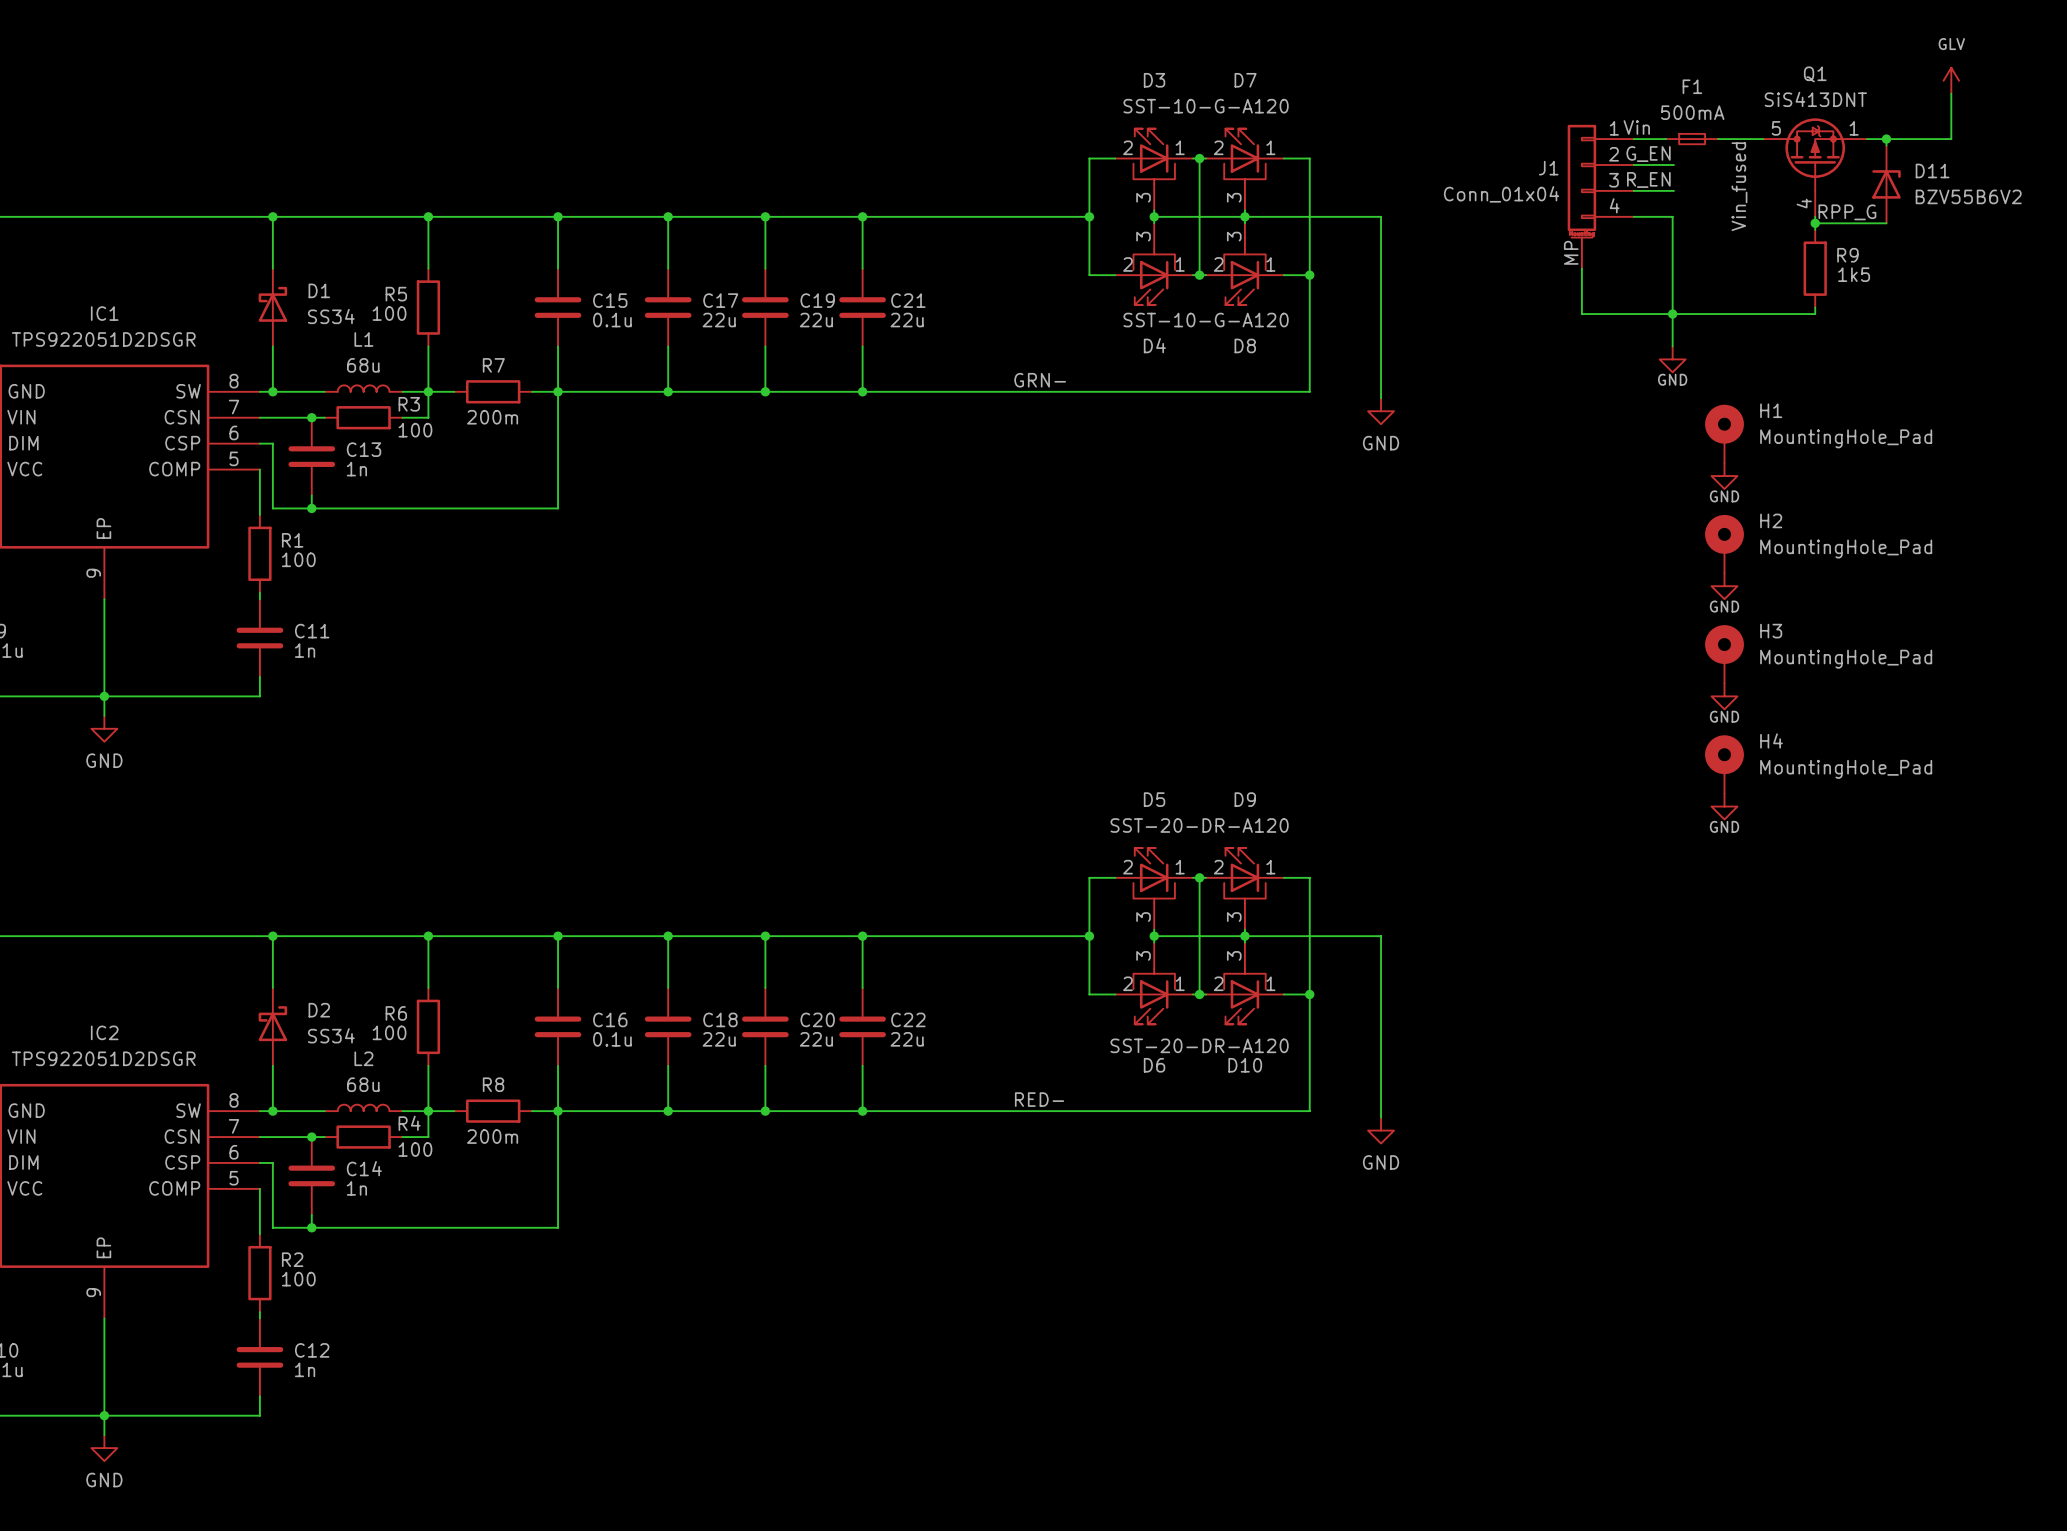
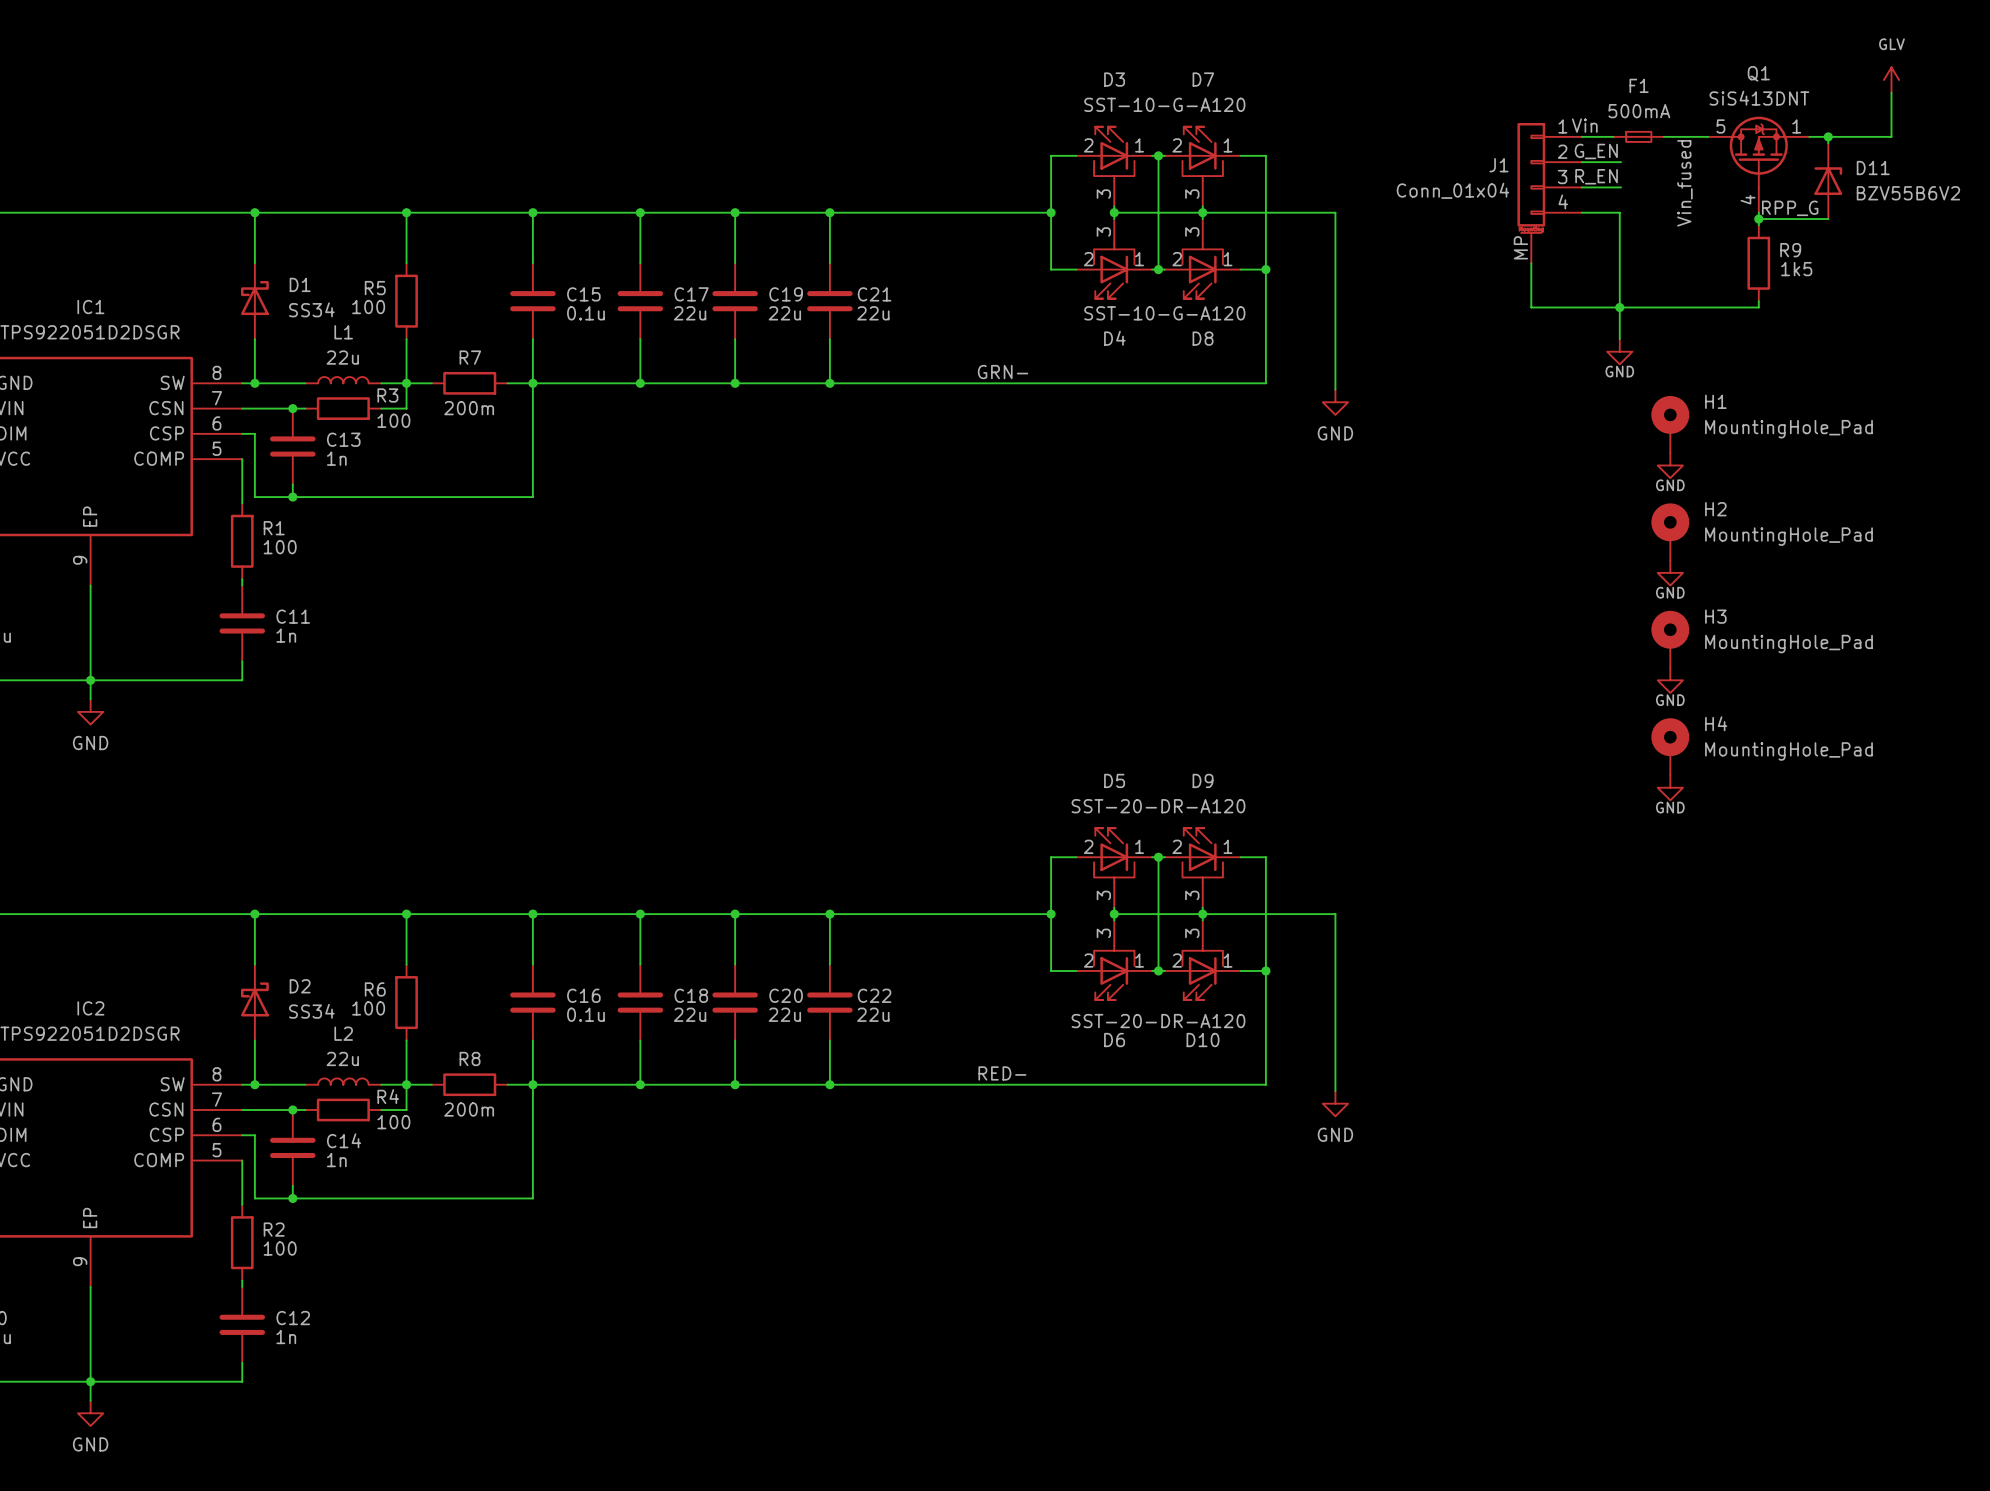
L1 value: 68u (363, 365) -> 22u (342, 357)
L2 value: 68u (363, 1084) -> 22u (342, 1058)

